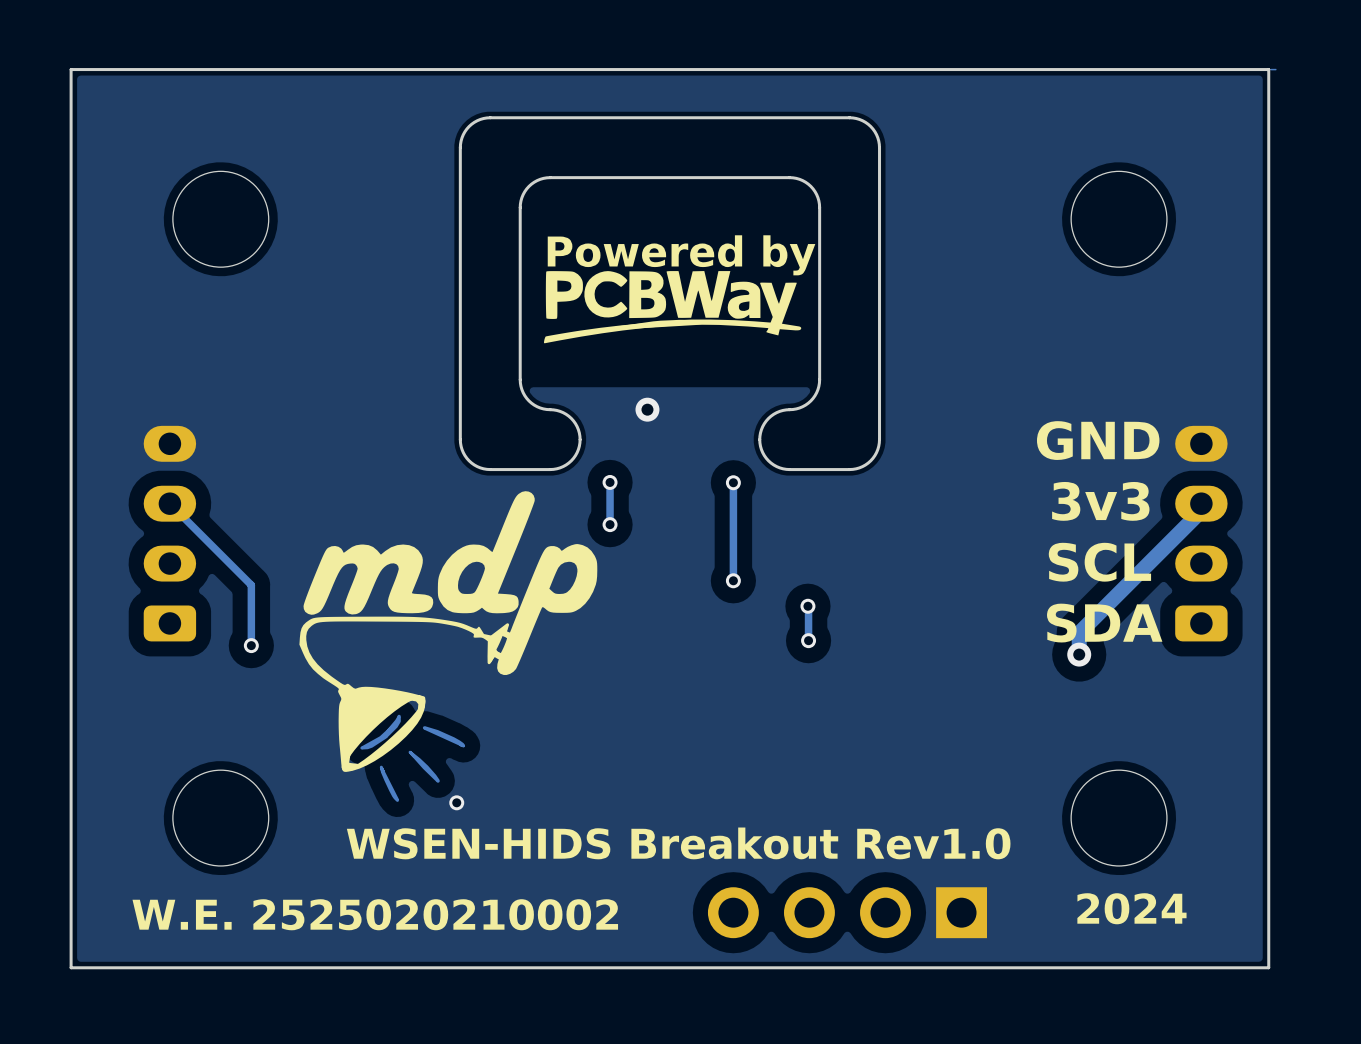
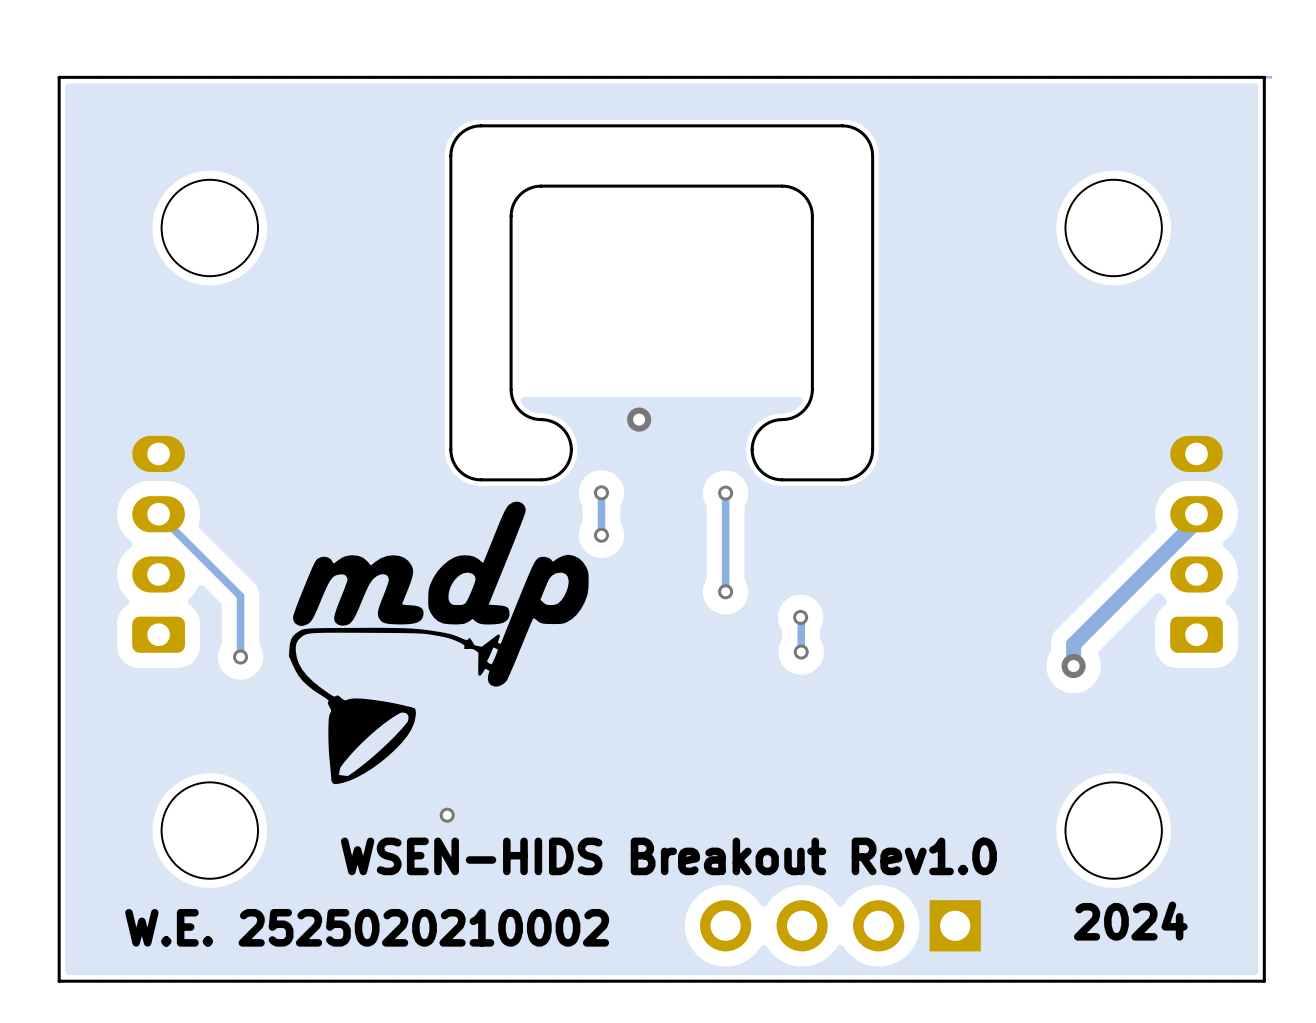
text: Powered by (681, 255) -> none
drawing: [543, 271, 802, 344] -> none
text: GND (1098, 440) -> none
text: 3v3 (1100, 501) -> none
text: SCL (1099, 562) -> none
text: SDA (1104, 623) -> none
drawing: [360, 714, 466, 802] -> none

